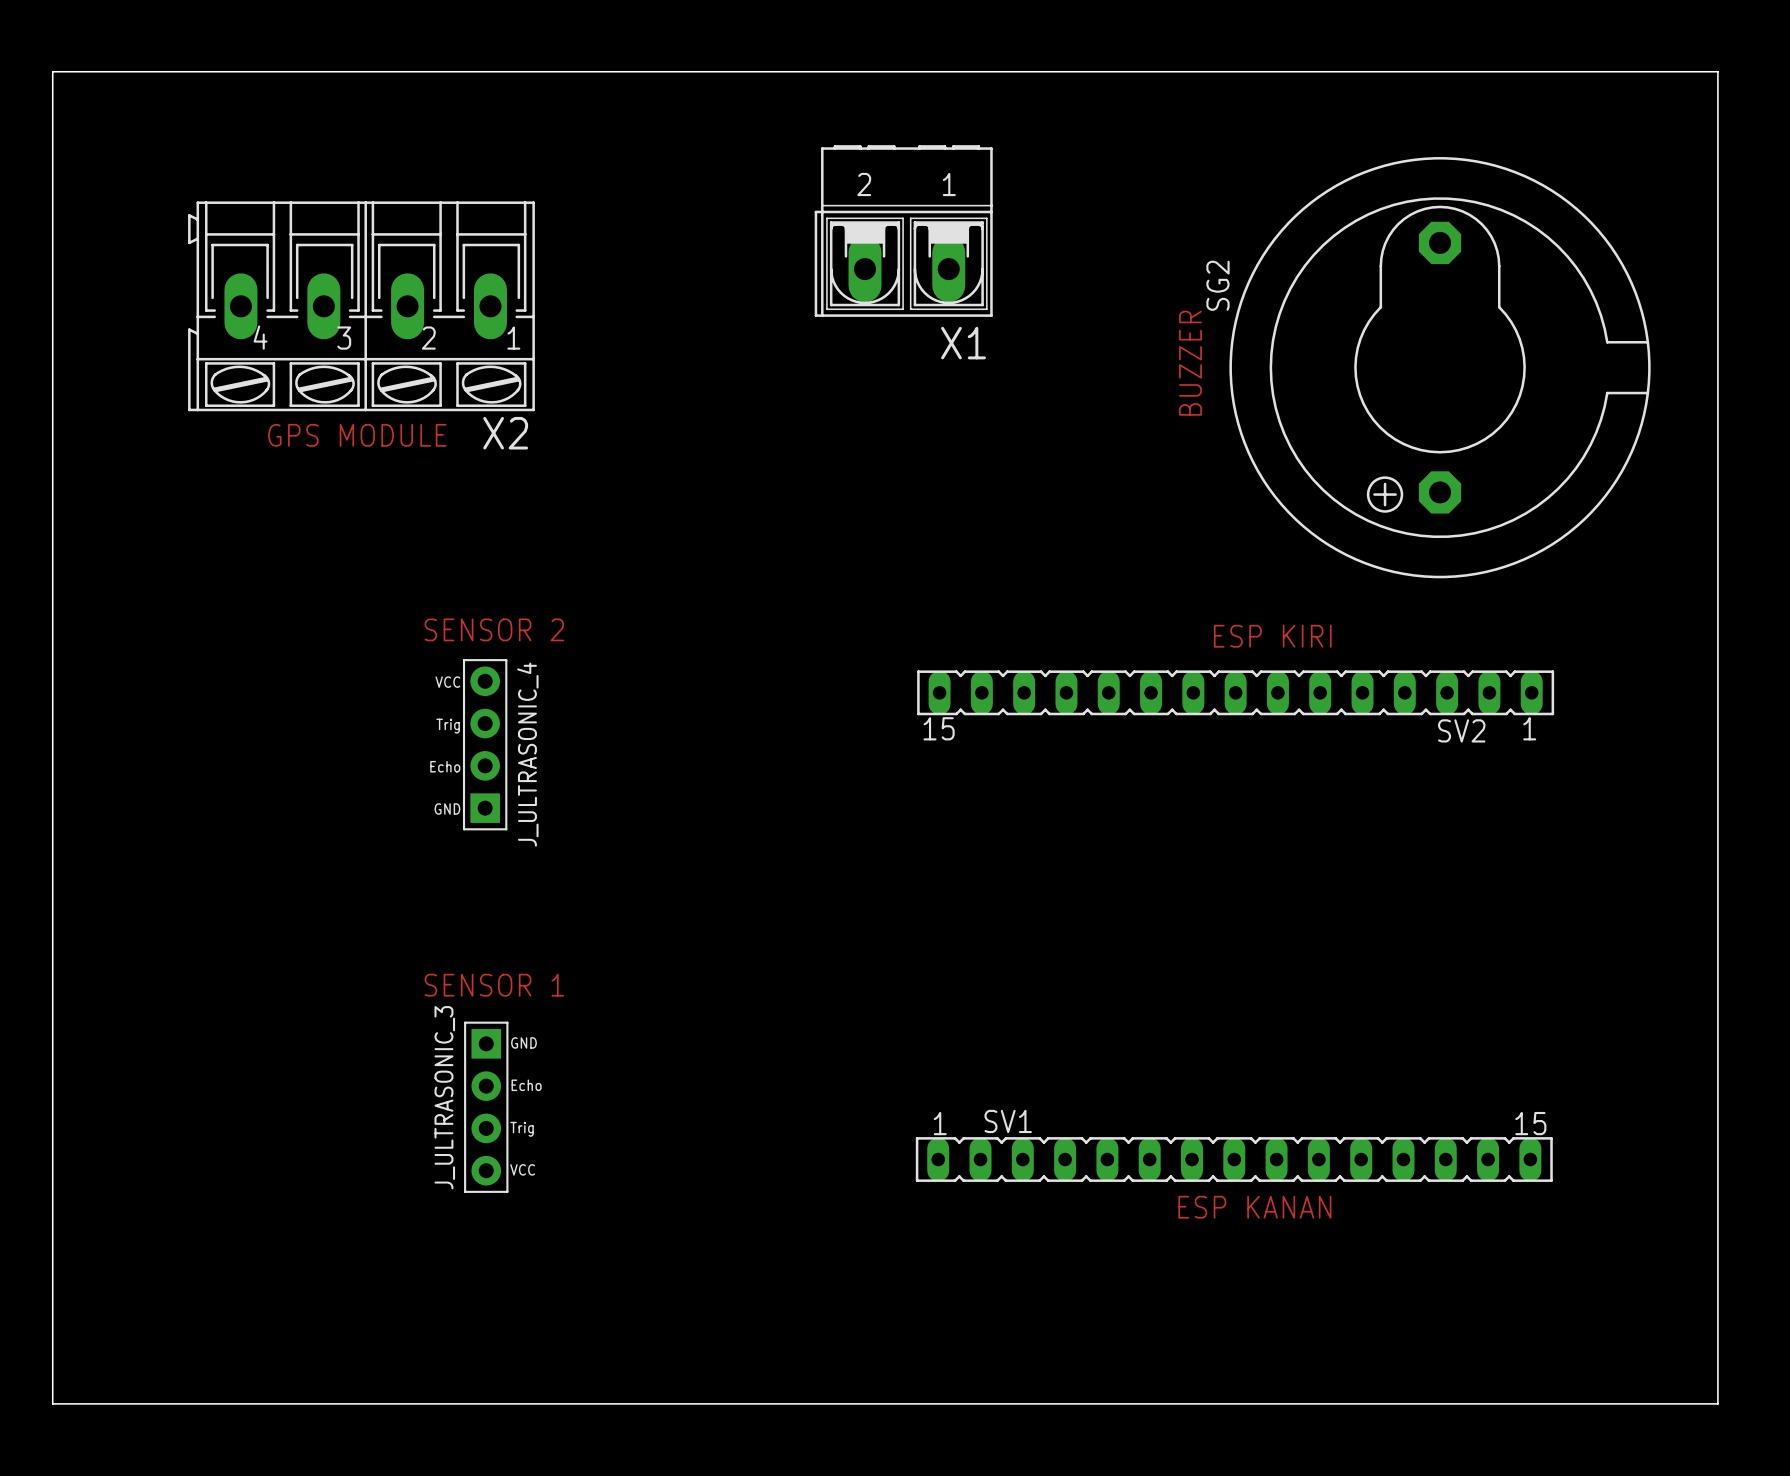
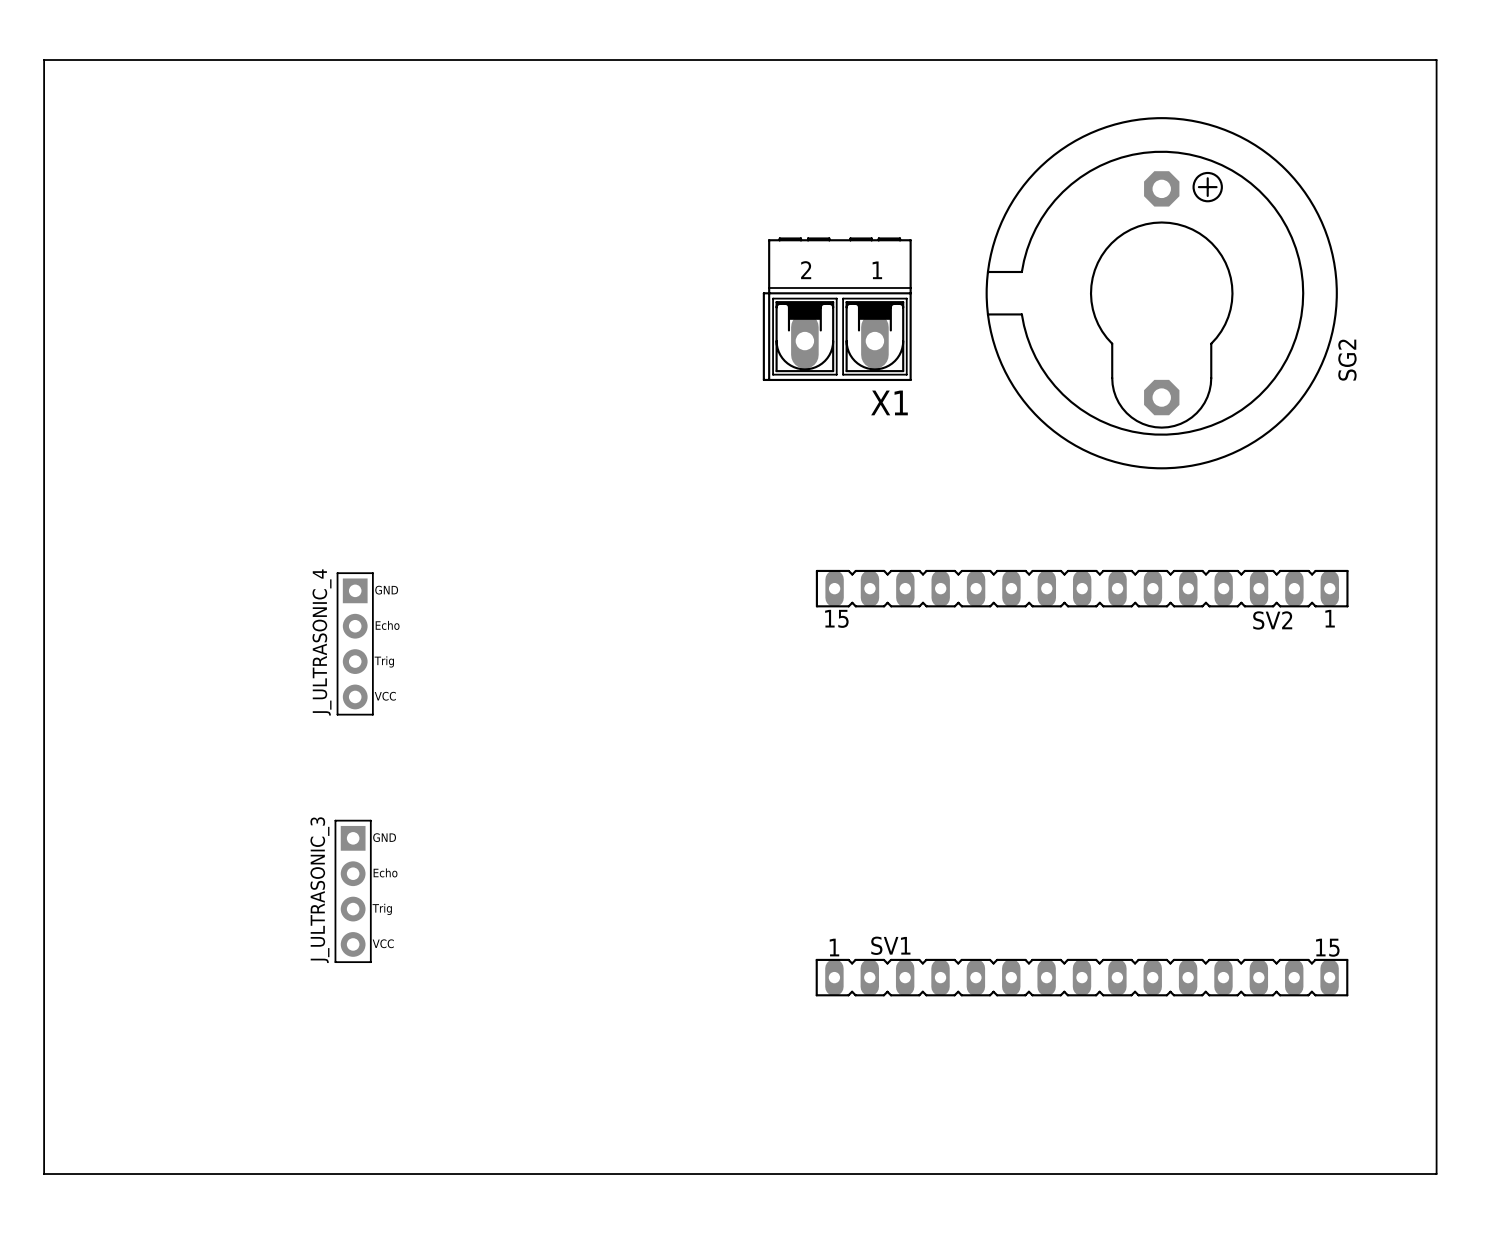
X1 position: (903, 231) -> (837, 309)
X2: (361, 306) -> none
text: BUZZER (1190, 363) -> none
SG2 rotation: 0° (1440, 367) -> 180° (1161, 293)
text: GPS MODULE (357, 435) -> none
text: SENSOR 2 (494, 629) -> none
text: ESP KIRI (1272, 636) -> none
J_ULTRASONIC_4 footprint: [462, 659, 508, 831] -> [336, 572, 374, 716]
SV2 position: (1235, 692) -> (1082, 588)
J_ULTRASONIC_4 name position: J_ULTRASONIC_4 (527, 754) -> J_ULTRASONIC_4 (322, 642)
text: SENSOR 1 (494, 985) -> none
J_ULTRASONIC_3 position: (486, 1107) -> (353, 891)
SV1 position: (1234, 1159) -> (1082, 977)
text: ESP KANAN (1254, 1207) -> none

